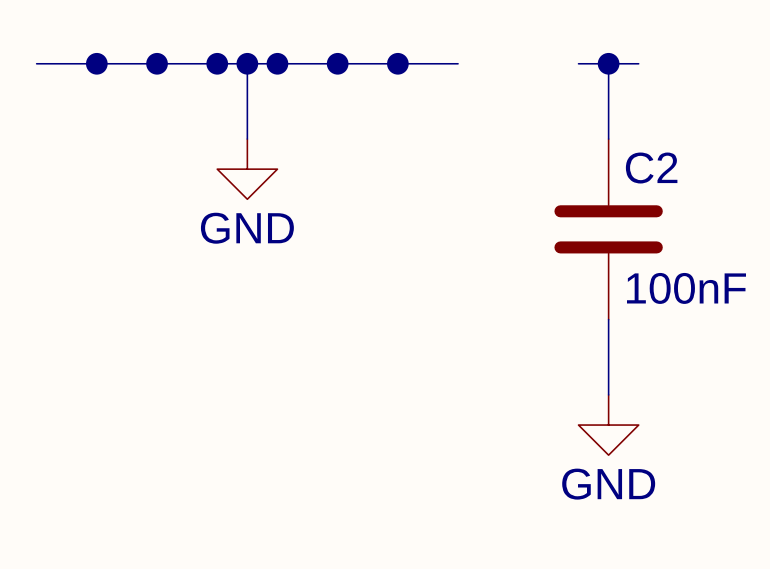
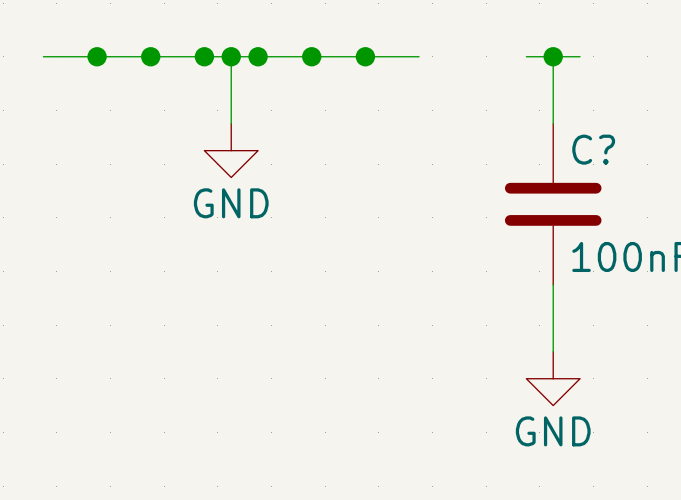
C2 name: C2 (651, 168) -> C? (593, 149)

